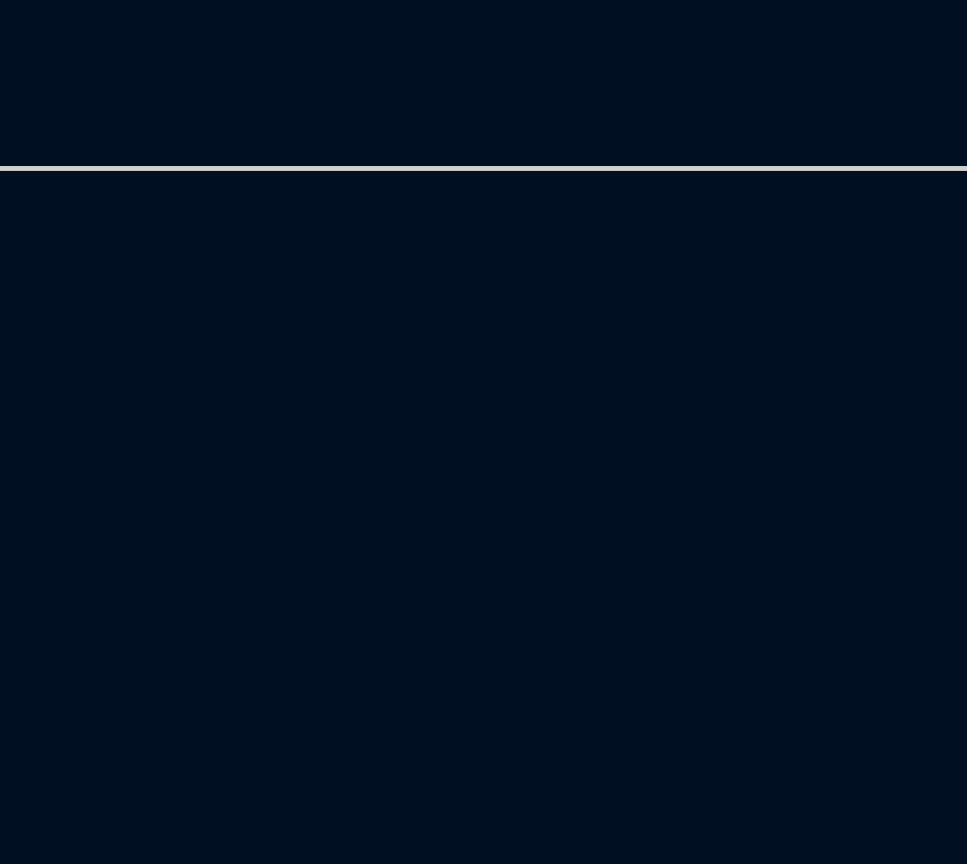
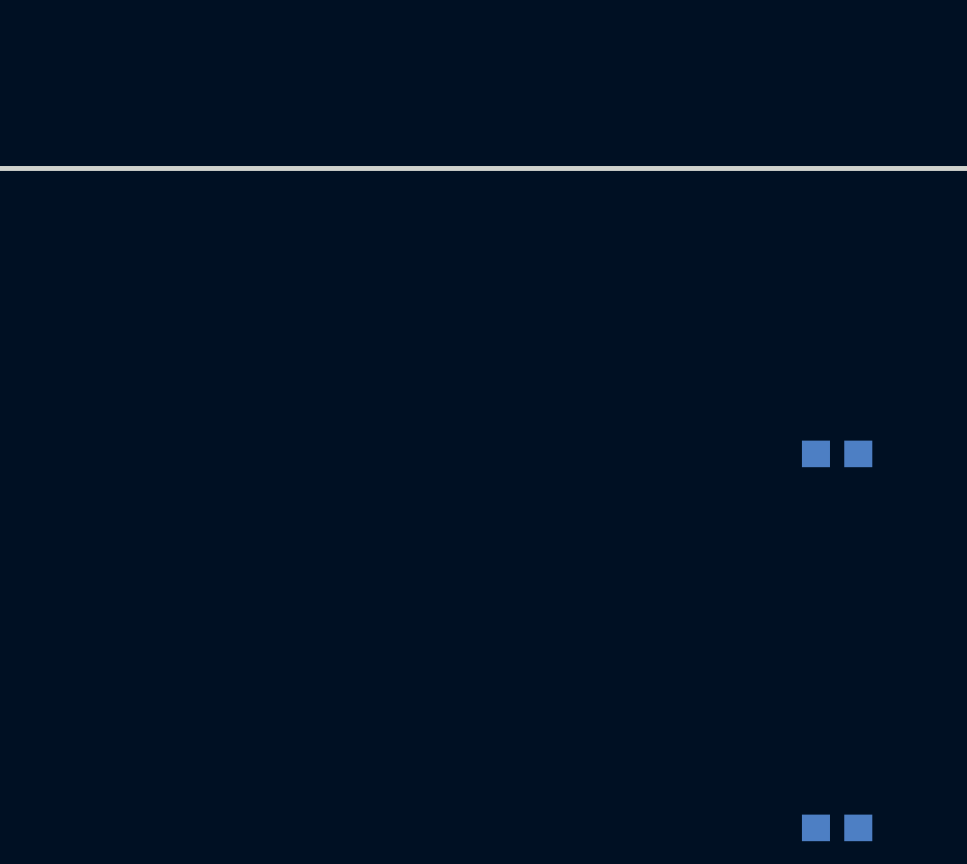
part: none -> (837, 453)
part: none -> (837, 827)

